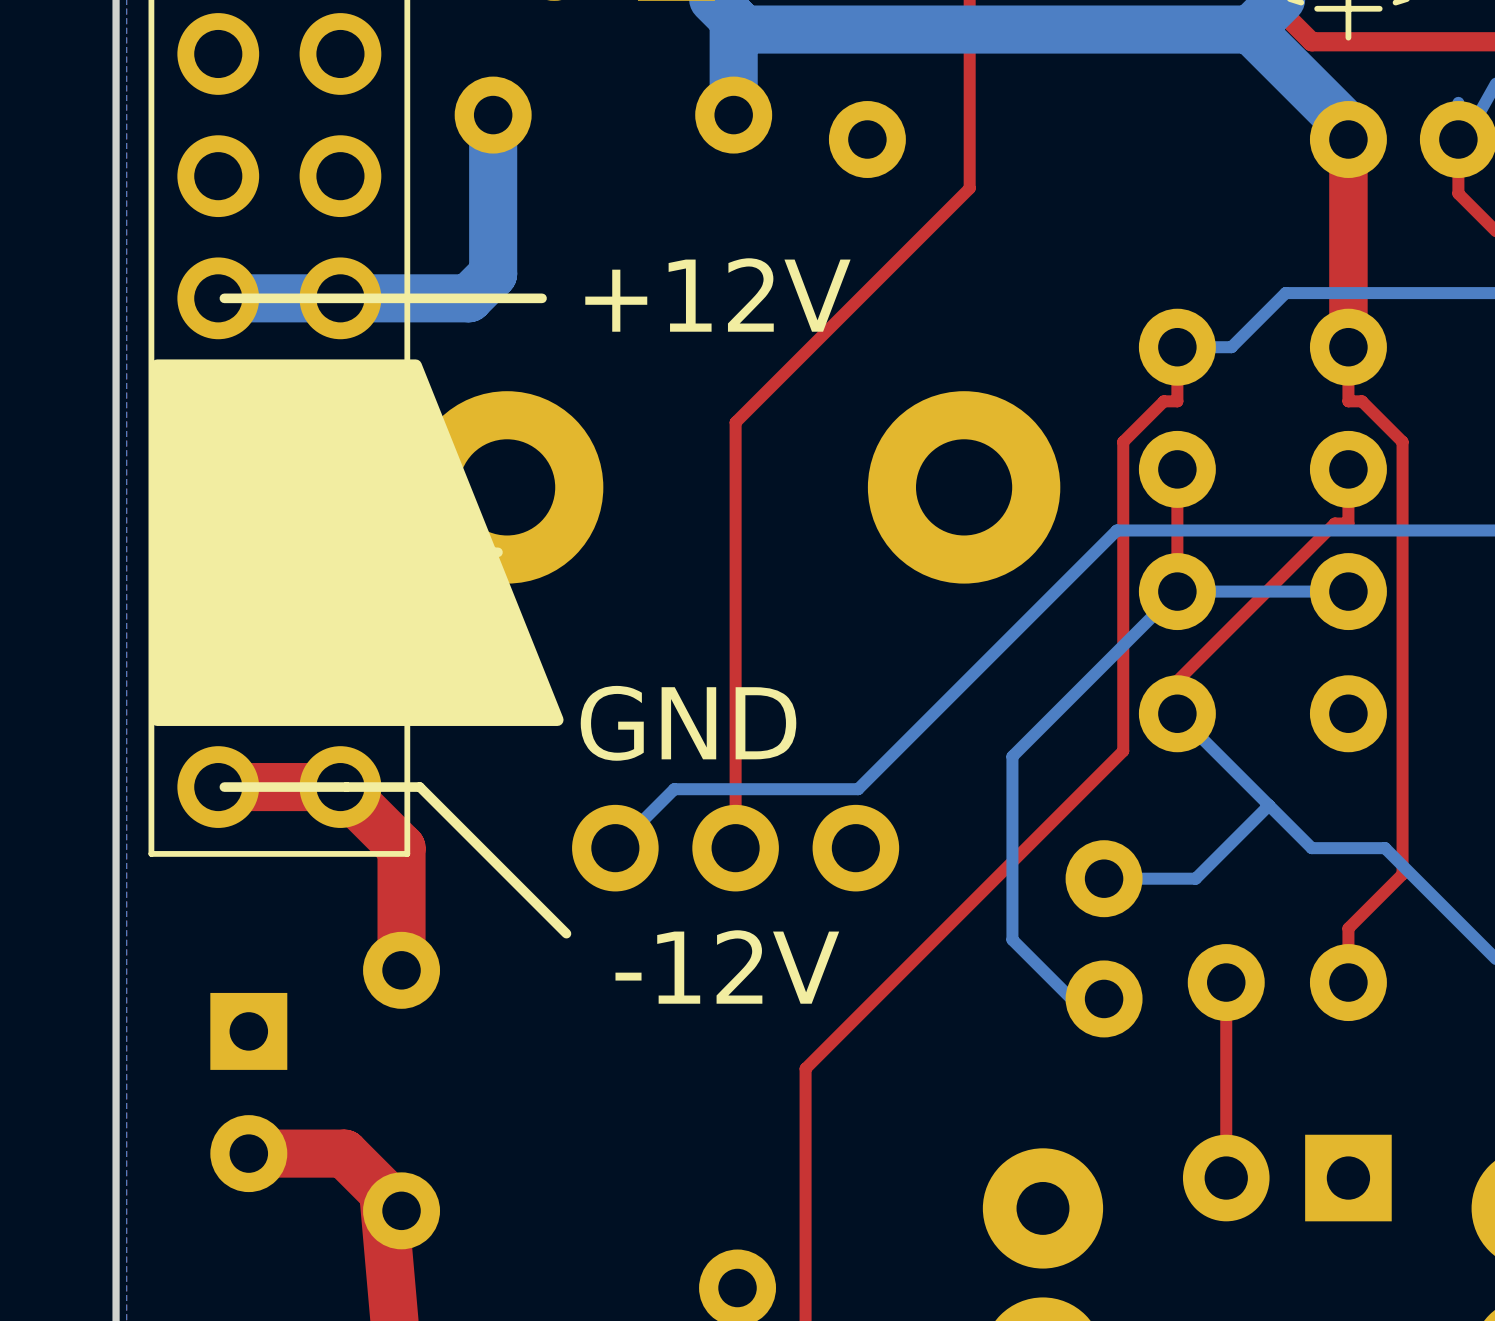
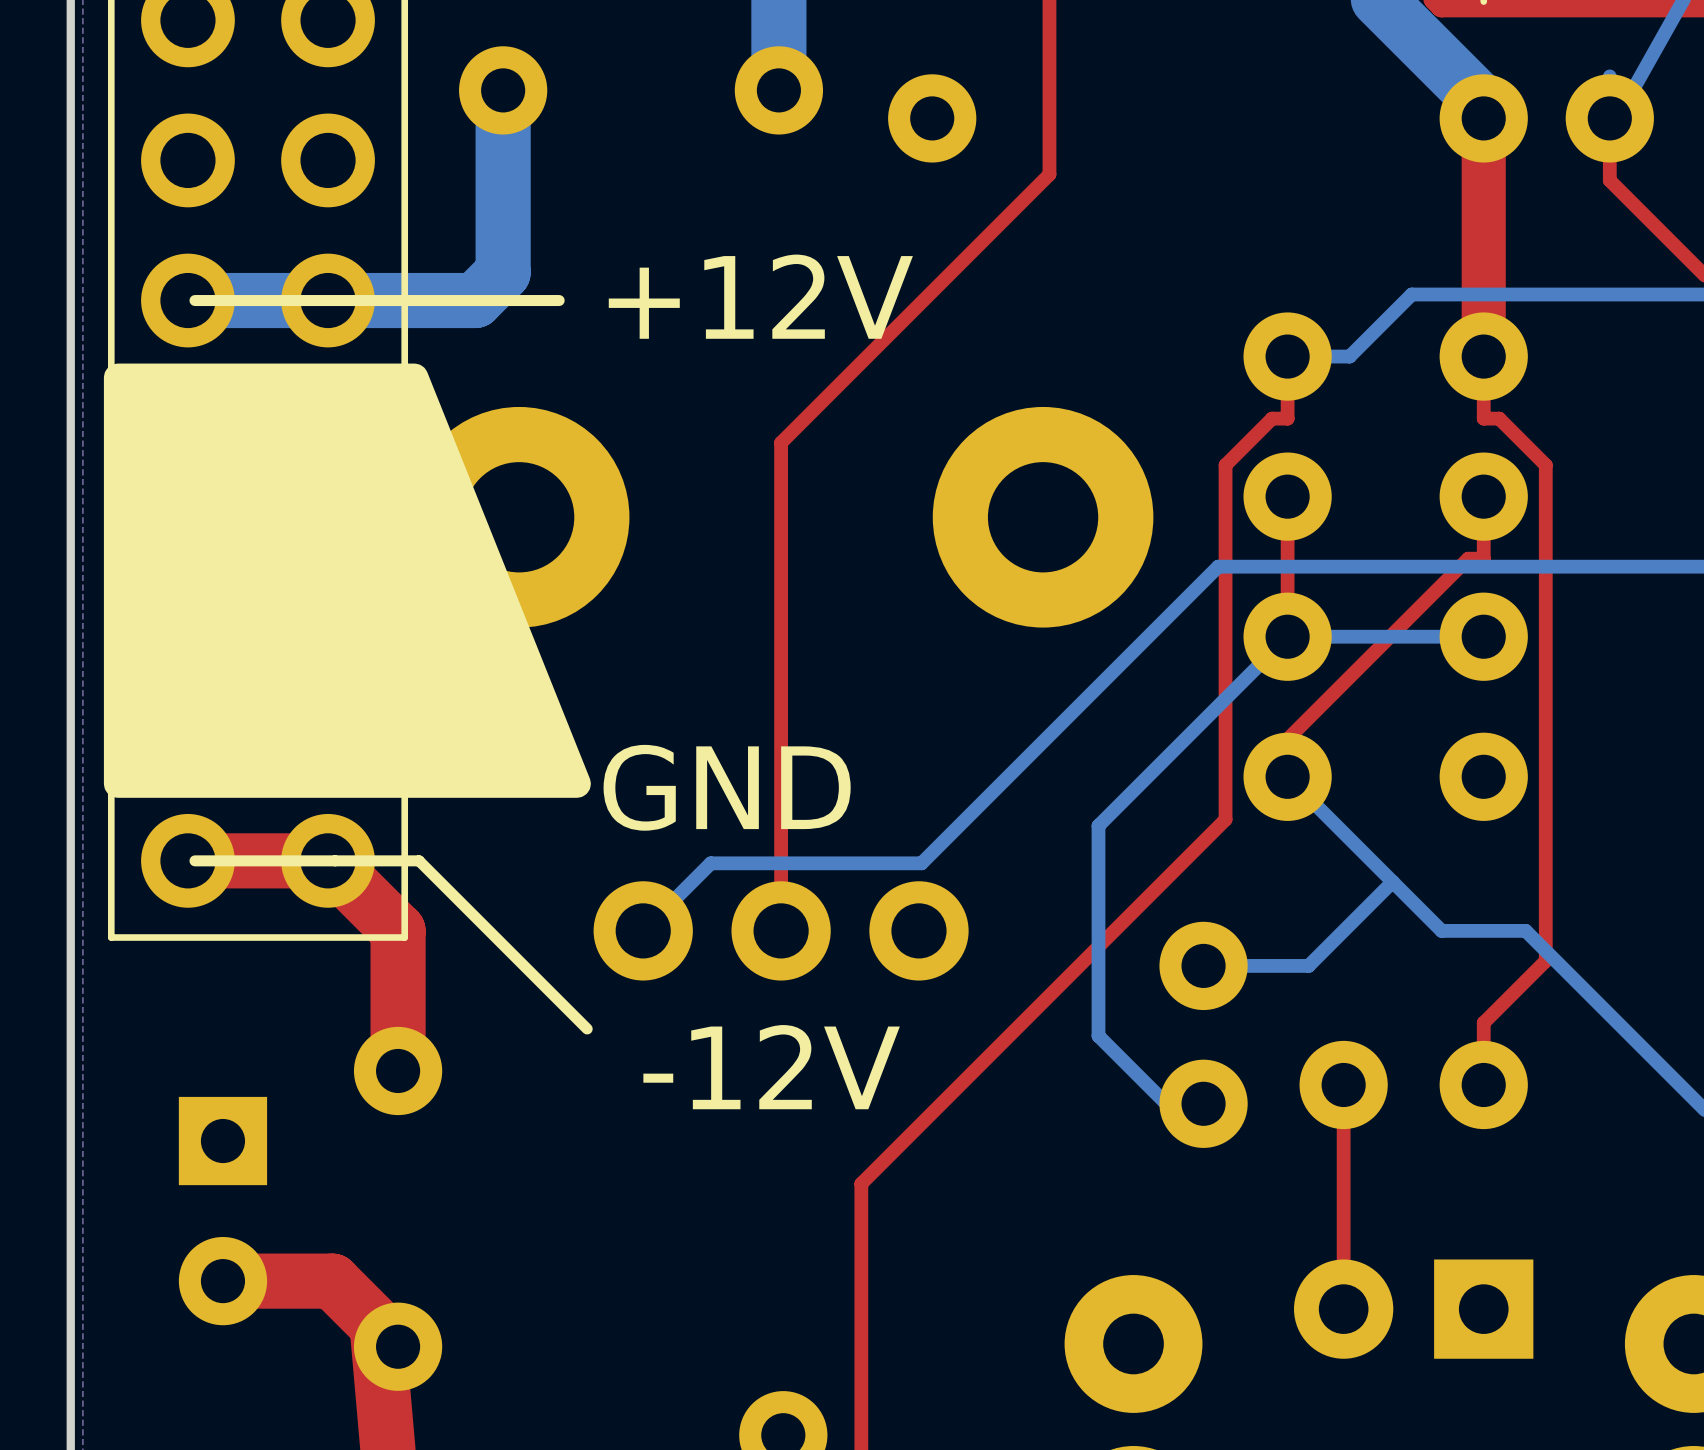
drawing shape: [151, 359, 564, 726] -> [103, 363, 591, 798]

